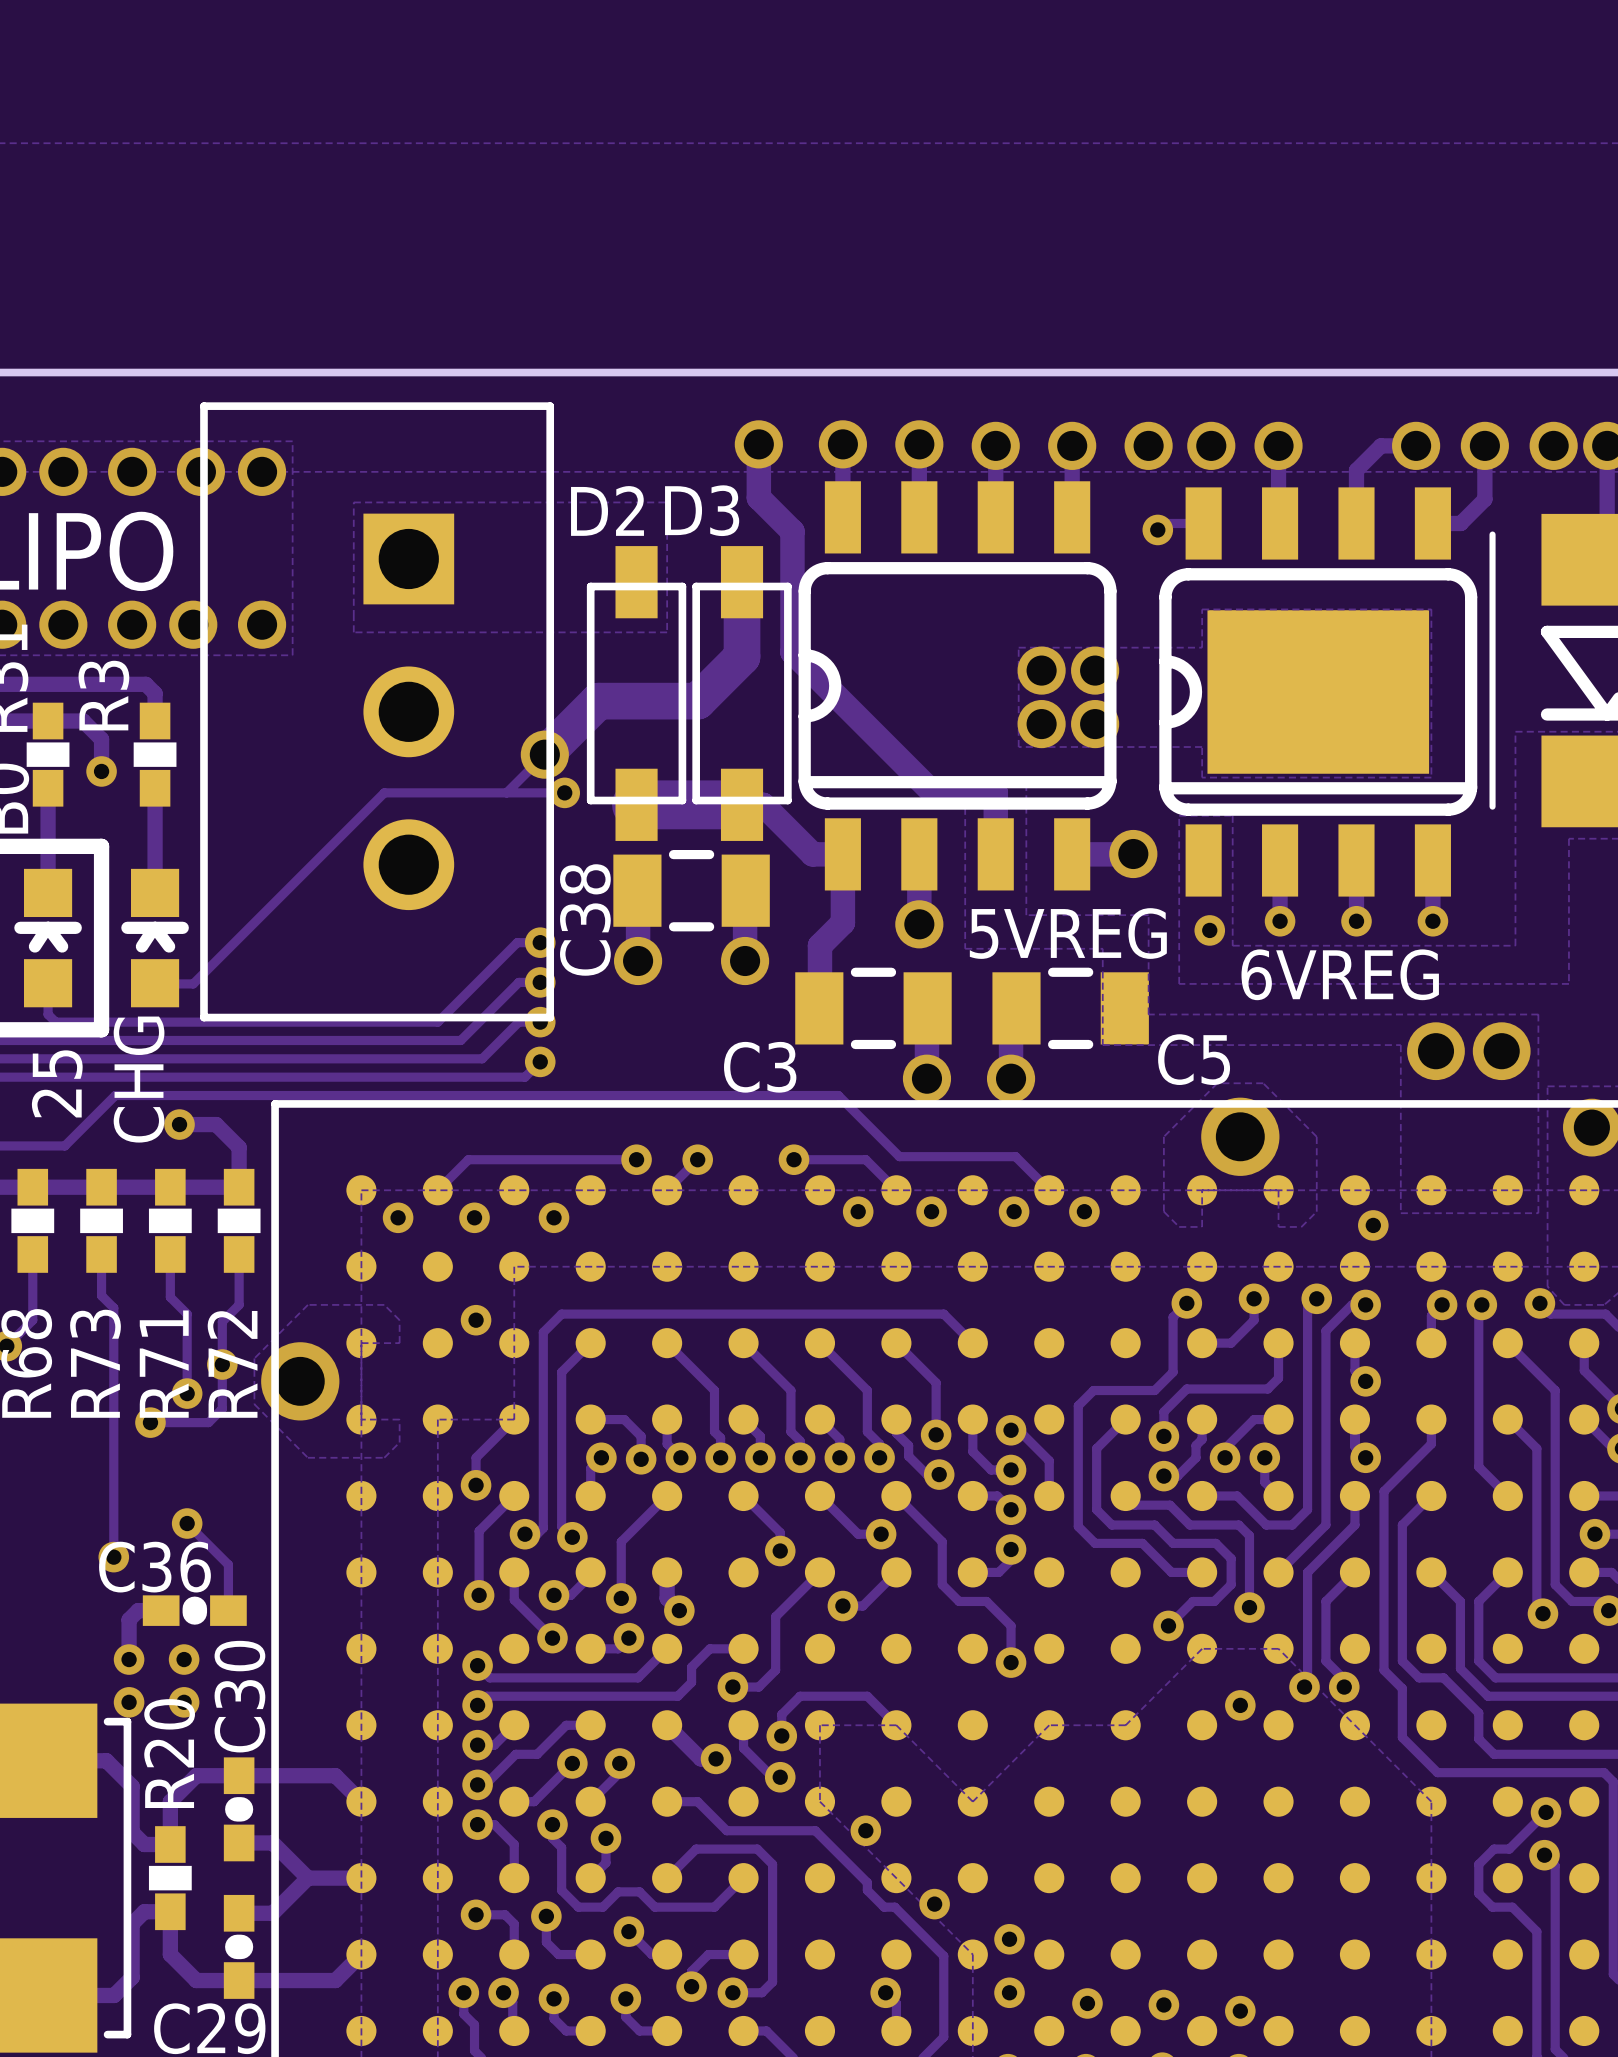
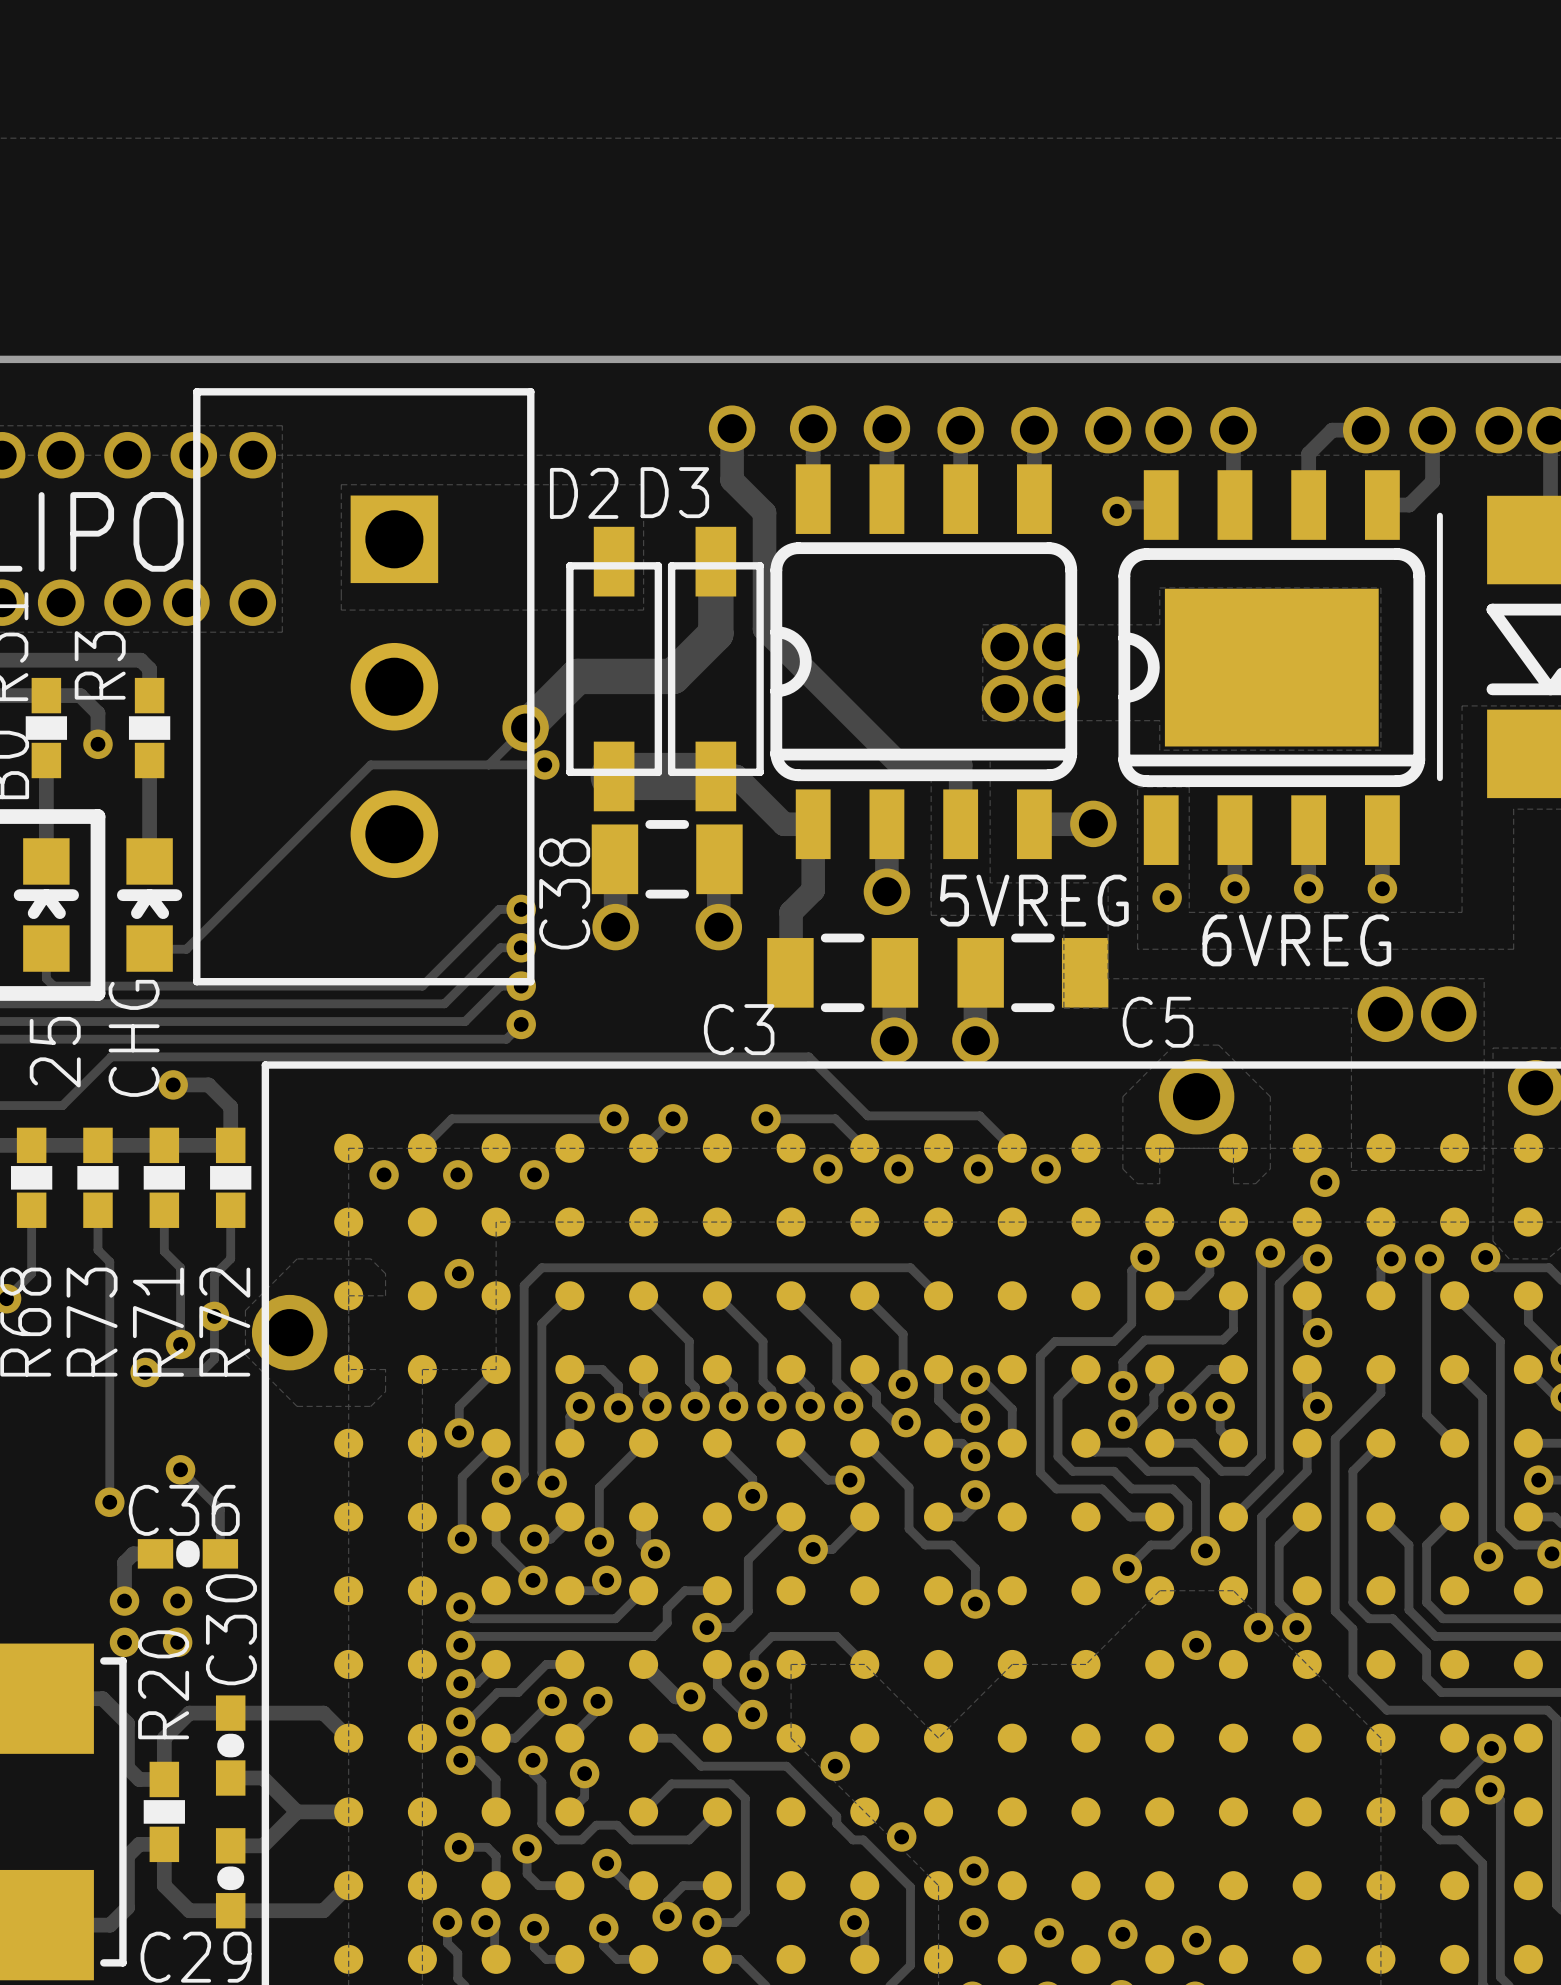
C36 name position: C36 (154, 1567) -> C36 (184, 1510)

